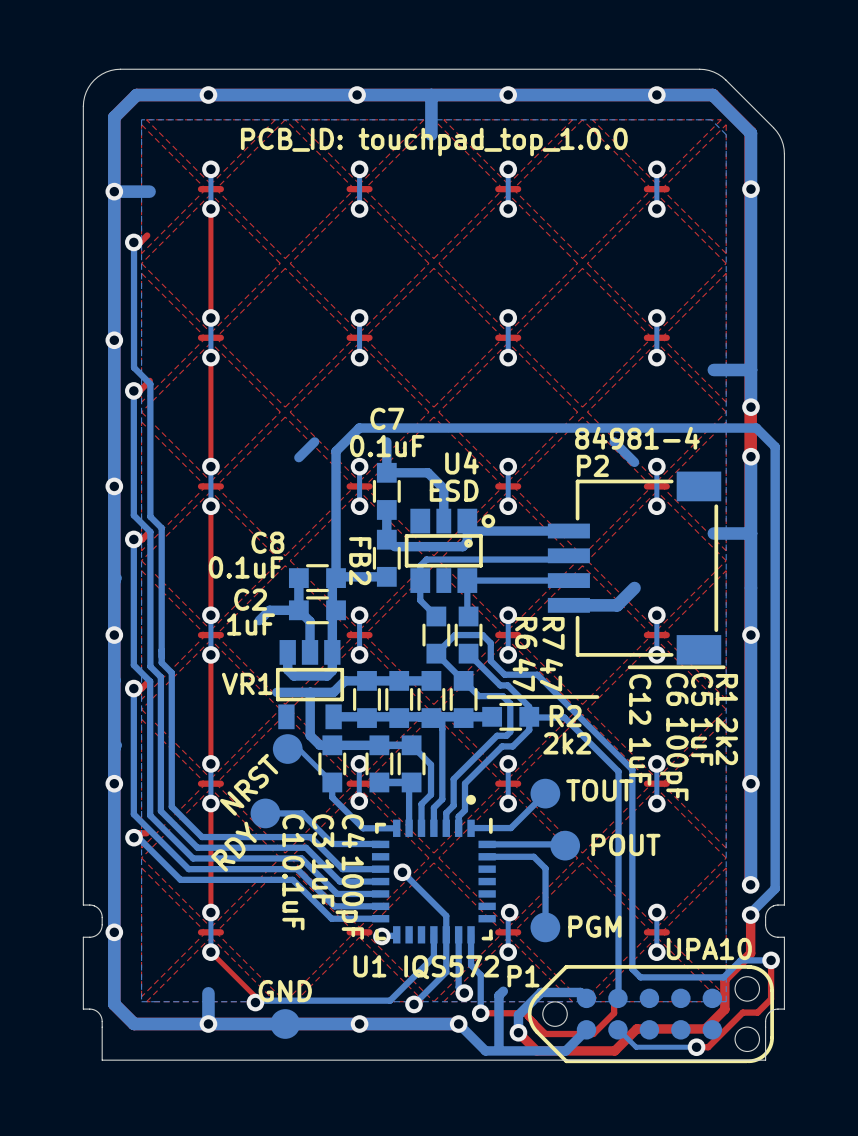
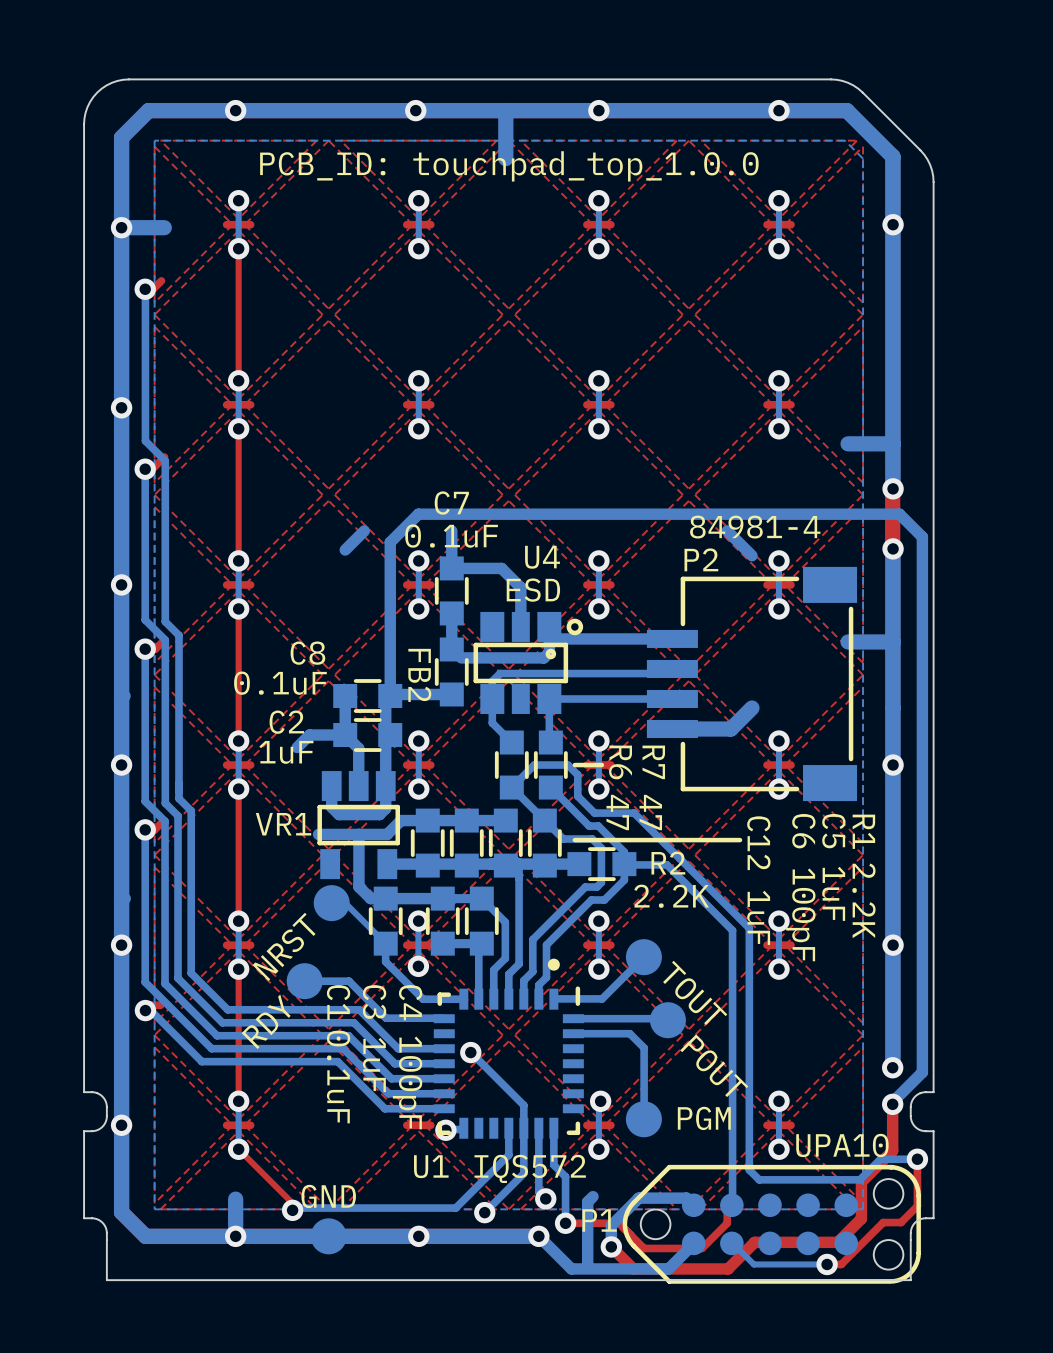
line: none -> (601, 765) (574, 765)
line: (723, 667) (629, 667) -> none
line: none -> (739, 840) (706, 840)
R1 value: 2k2 (726, 741) -> 2.2K (863, 900)
R2 value: 2k2 (567, 743) -> 2.2K (671, 896)
part value rotation: 0° (599, 790) -> 45° clockwise (695, 992)
part value rotation: 0° (625, 844) -> 45° clockwise (714, 1065)
P1 name position: P1 (523, 976) -> P1 (599, 1220)

